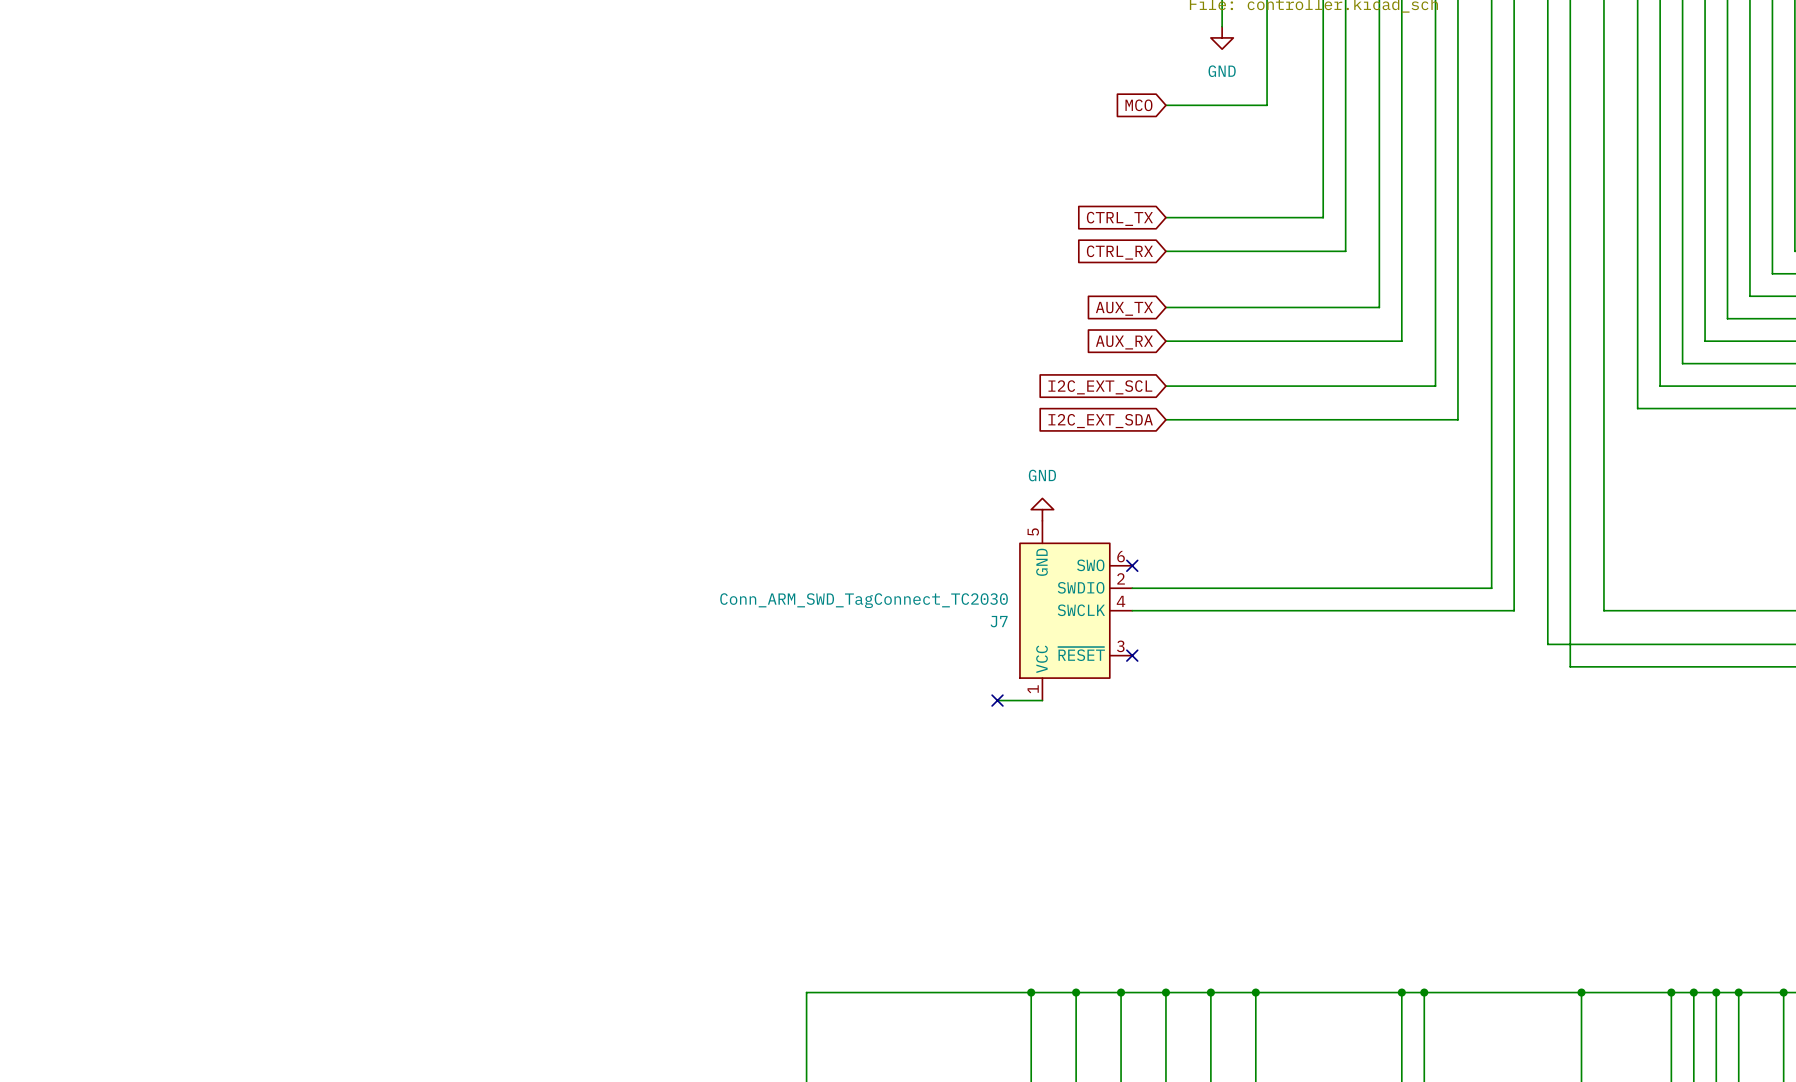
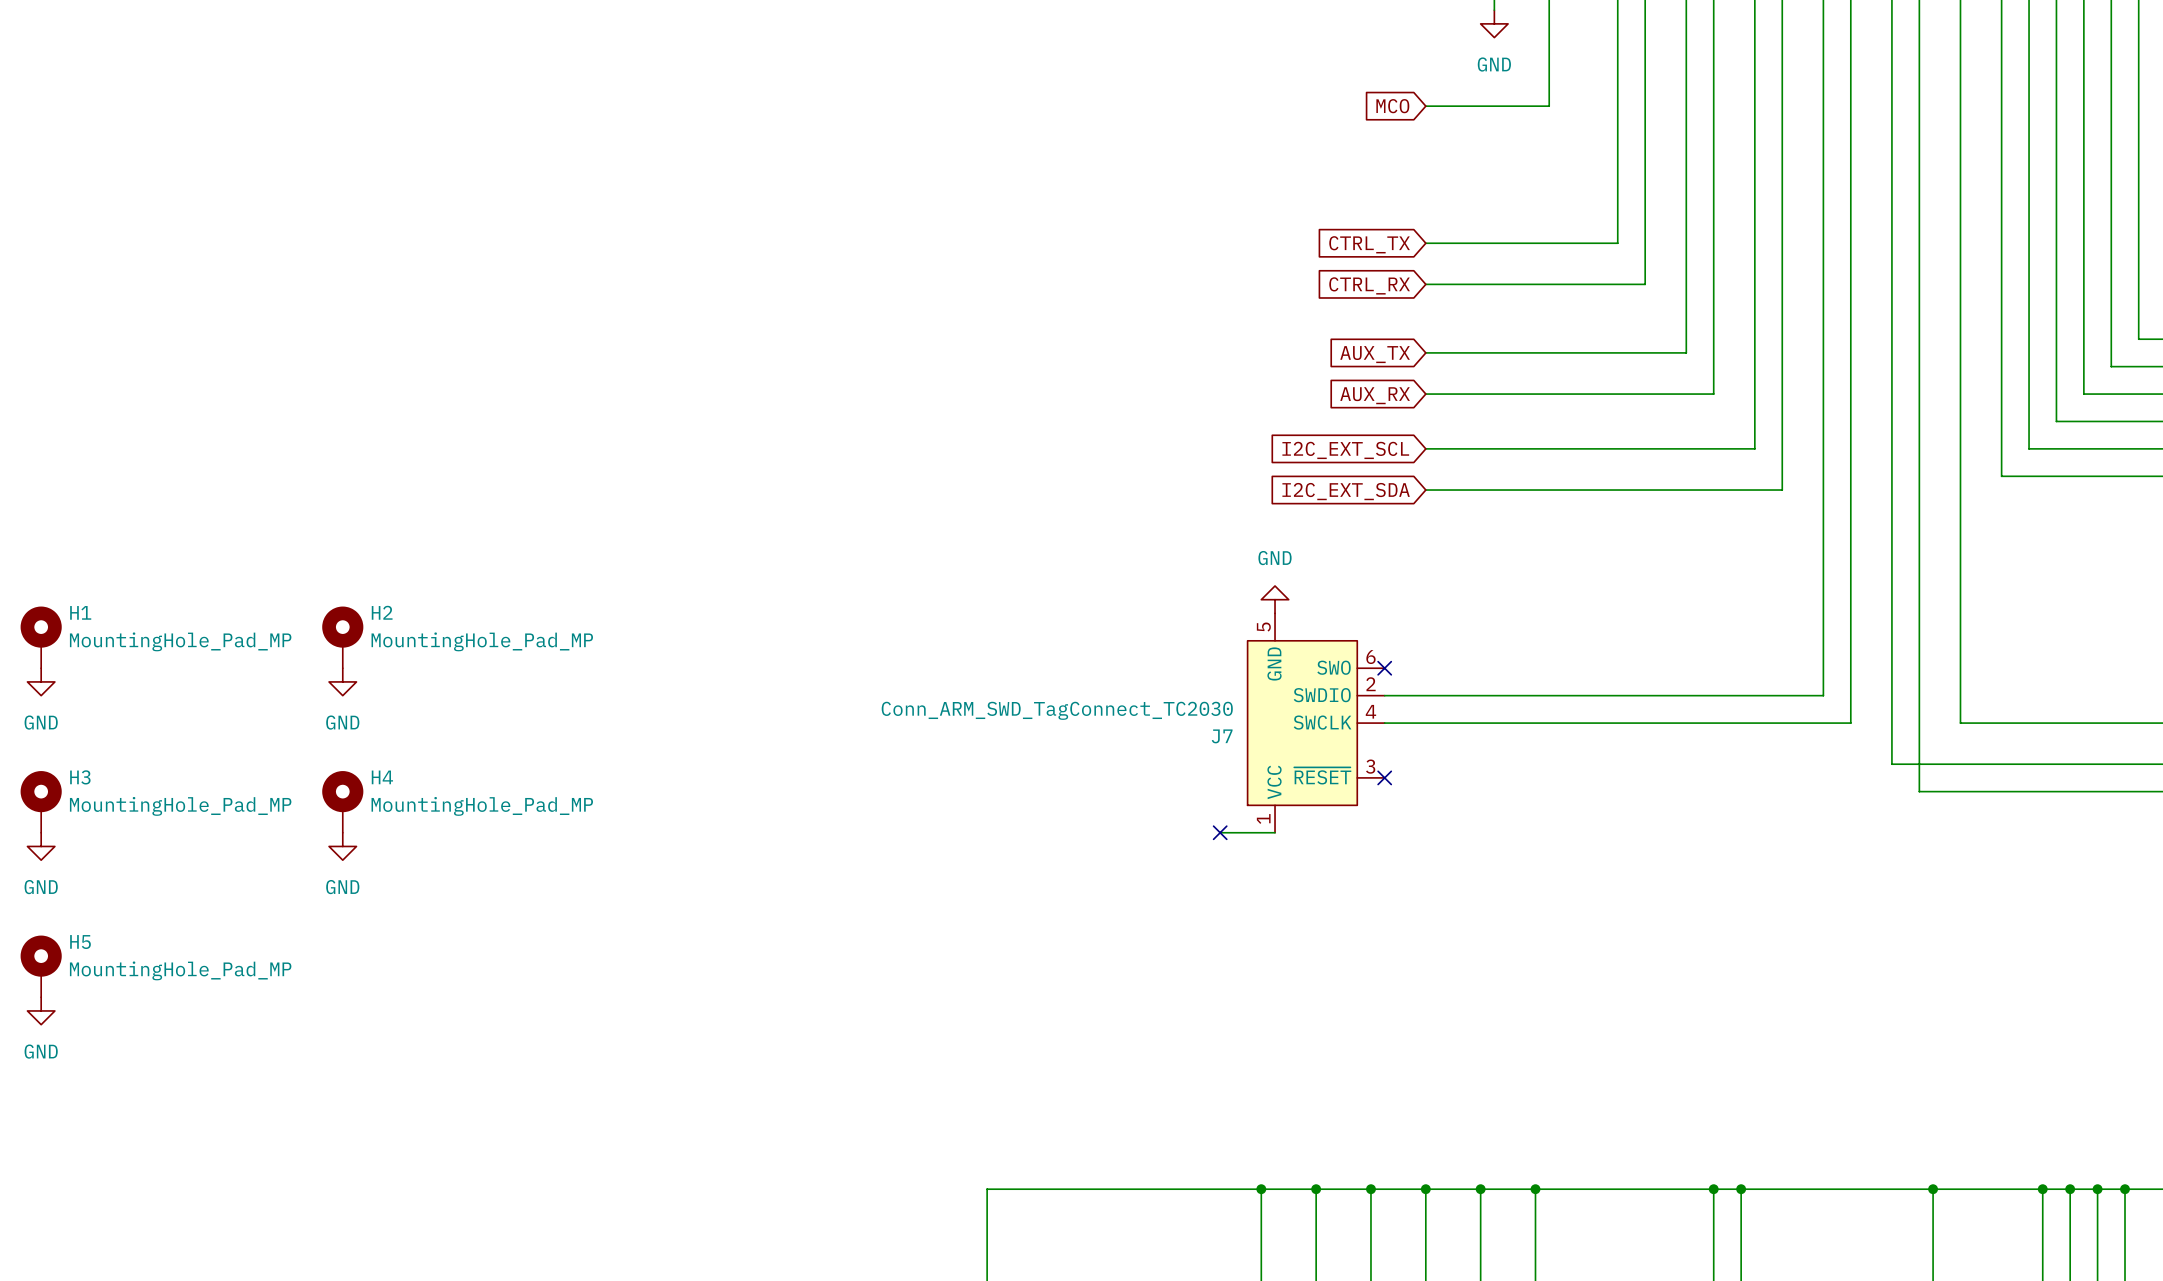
H1: none -> MountingHole_Pad_MP (41, 637)
H2: none -> MountingHole_Pad_MP (342, 637)
power symbol: none -> GND (41, 681)
power symbol: none -> GND (342, 681)
H3: none -> MountingHole_Pad_MP (41, 801)
H4: none -> MountingHole_Pad_MP (342, 801)
power symbol: none -> GND (41, 846)
power symbol: none -> GND (342, 846)
H5: none -> MountingHole_Pad_MP (41, 966)
power symbol: none -> GND (41, 1010)

